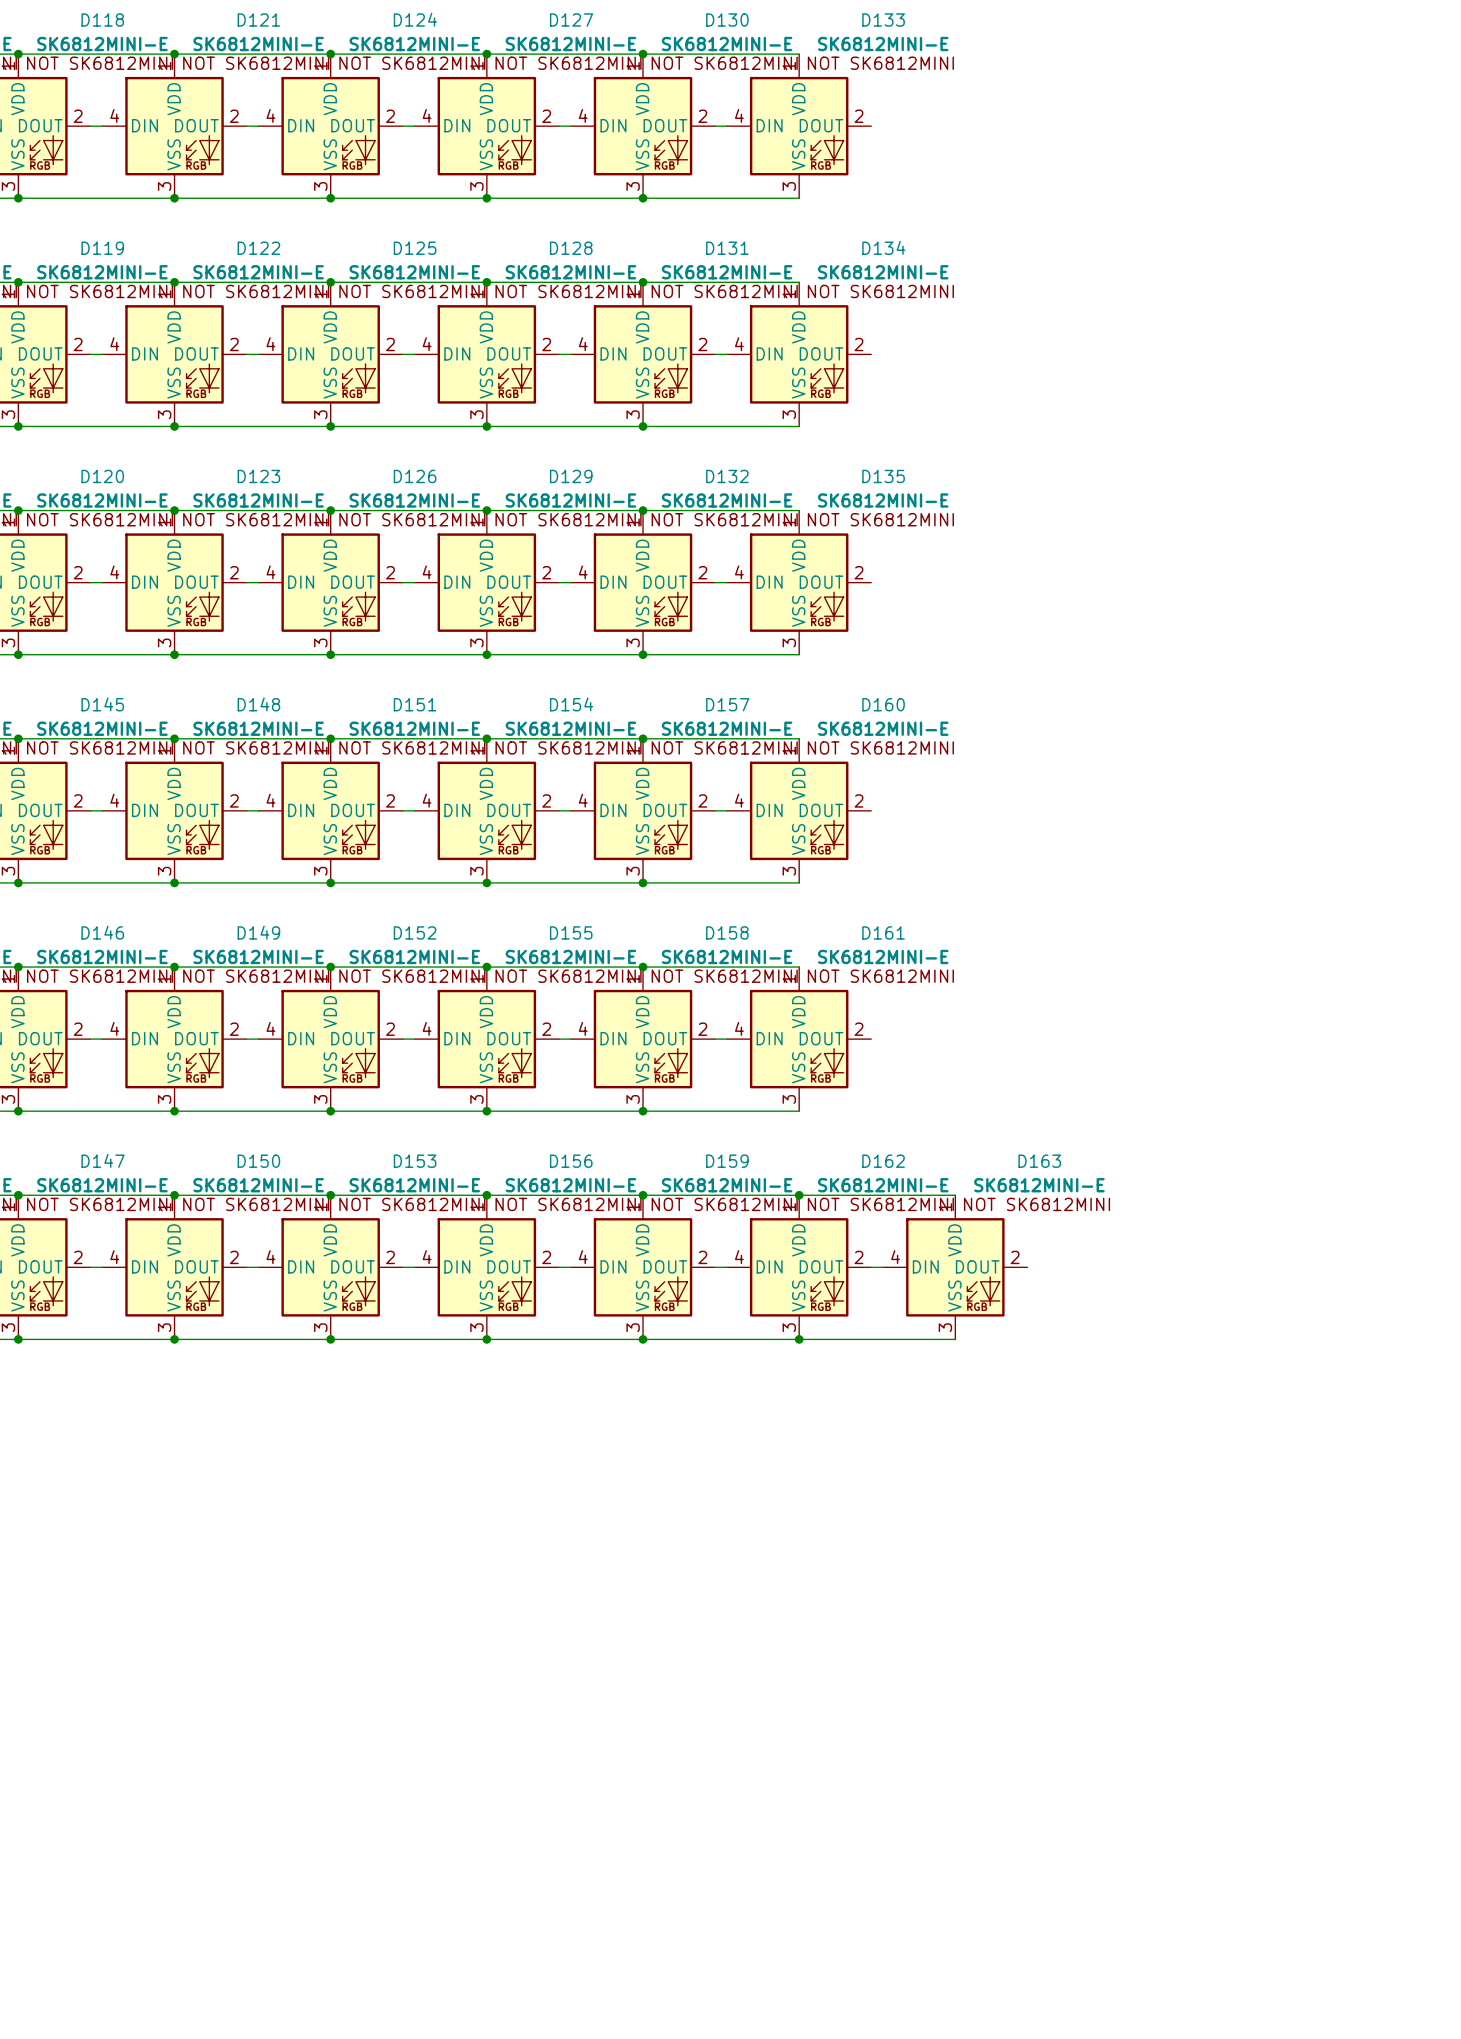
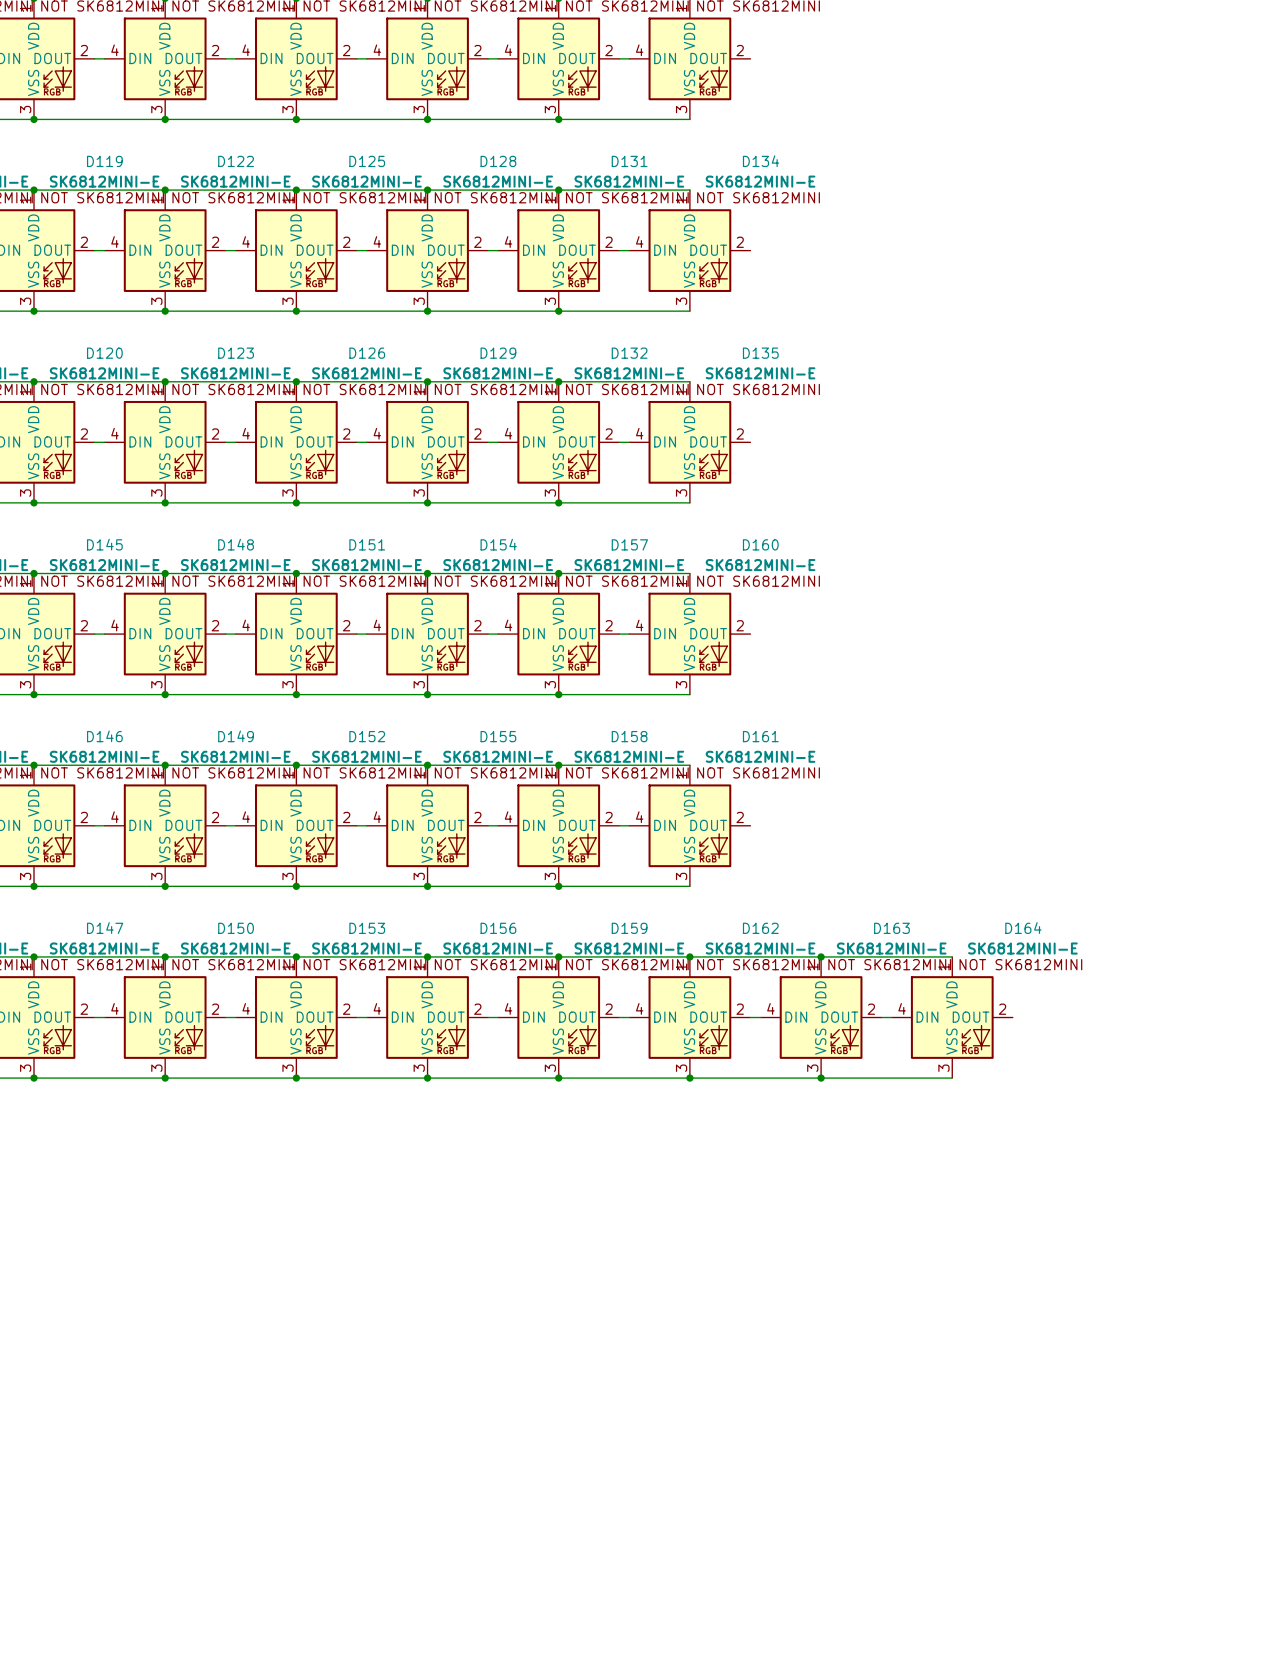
wire: none -> (821, 956) (952, 956)
junction: none -> (821, 956)
wire: none -> (881, 1017) (891, 1017)
D164: none -> SK6812MINI-E (952, 1017)
wire: none -> (821, 1078) (952, 1078)
junction: none -> (821, 1078)

